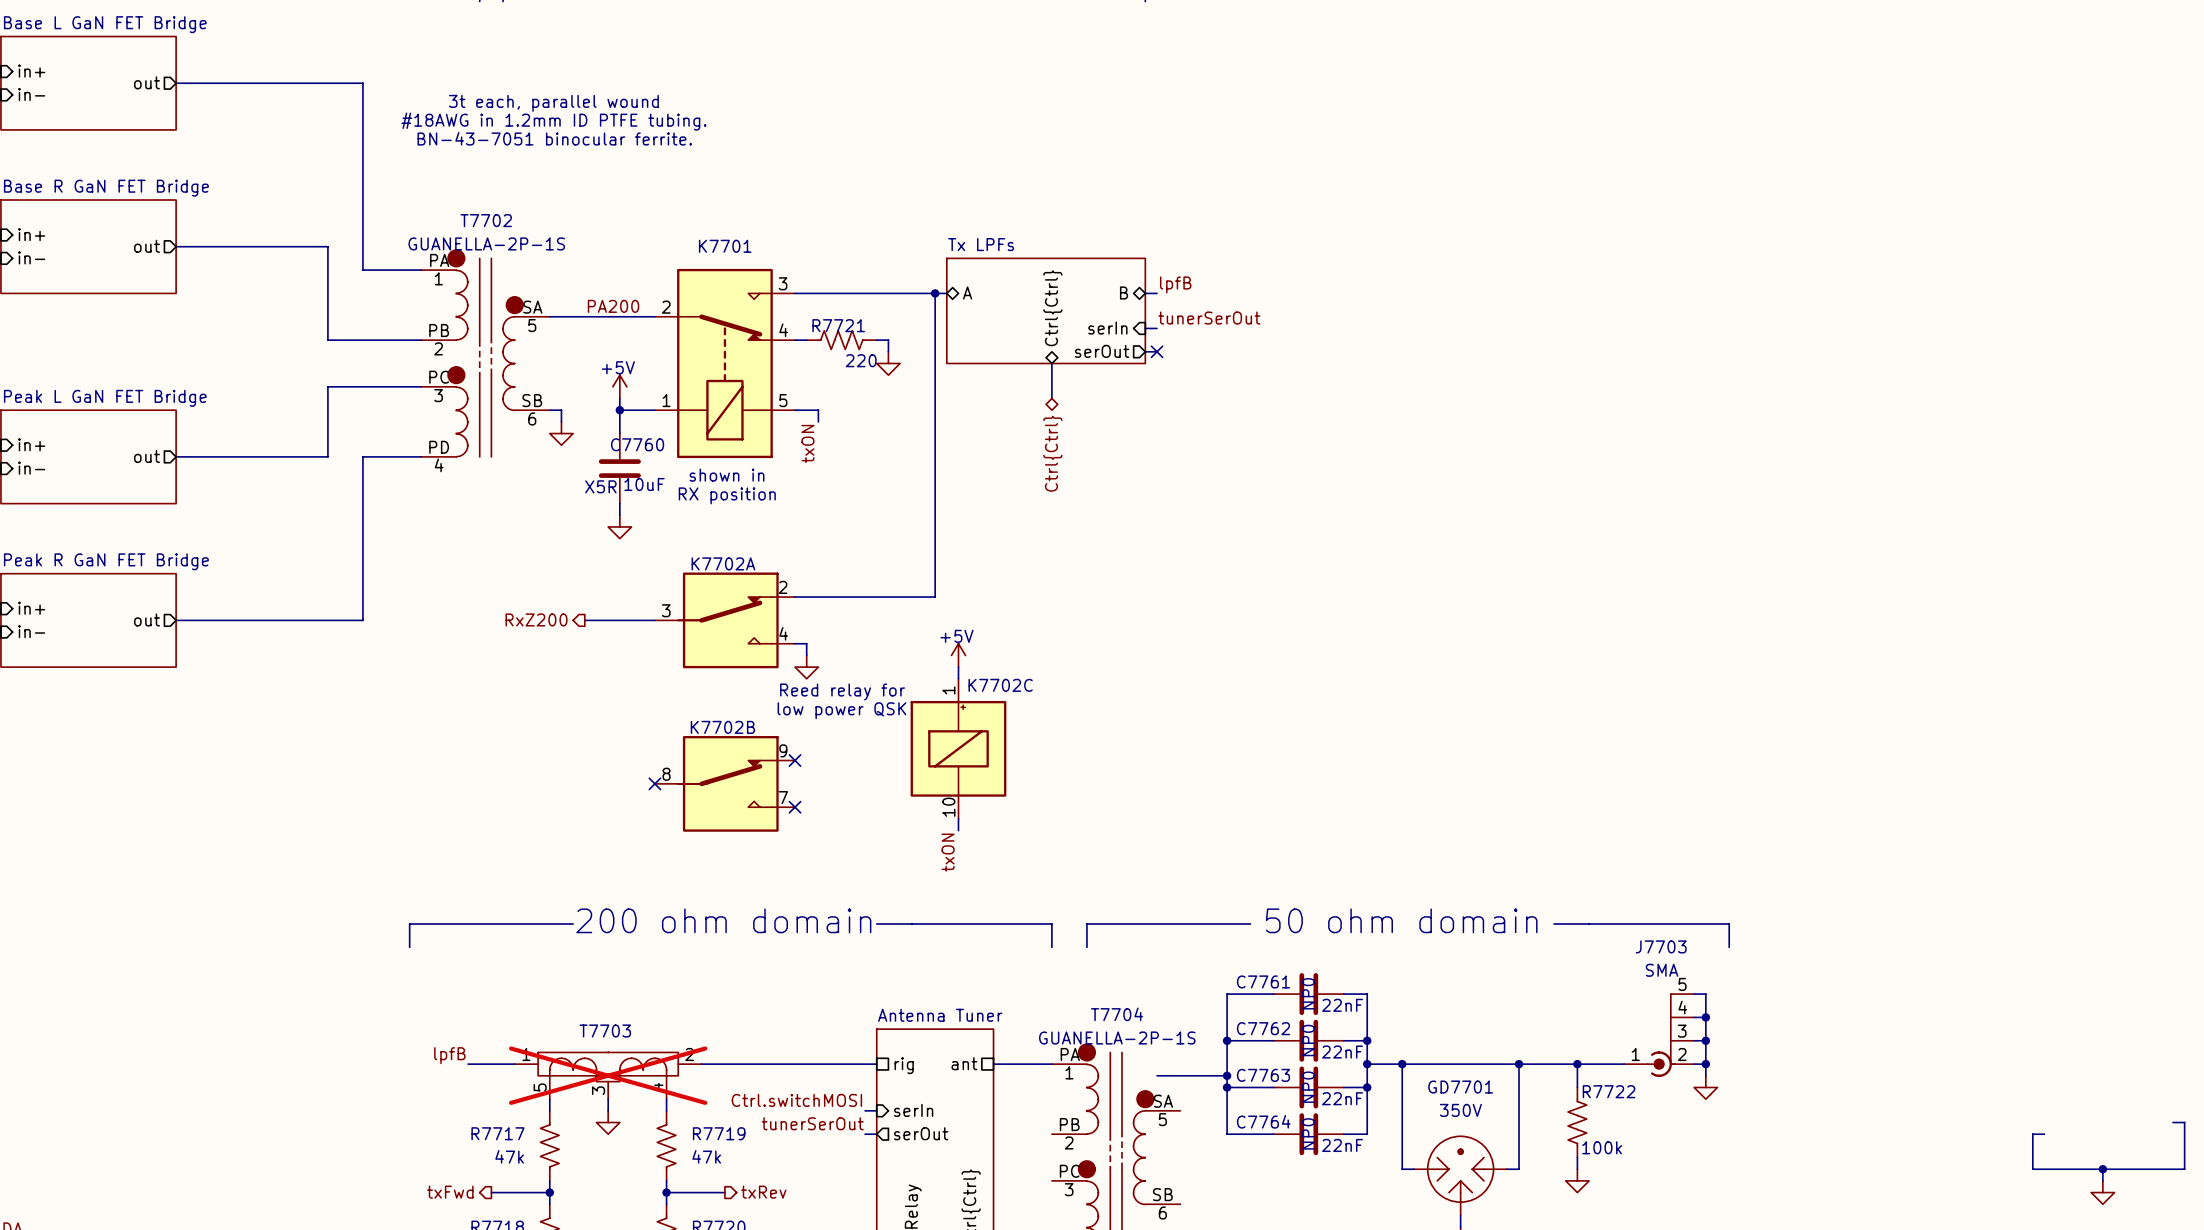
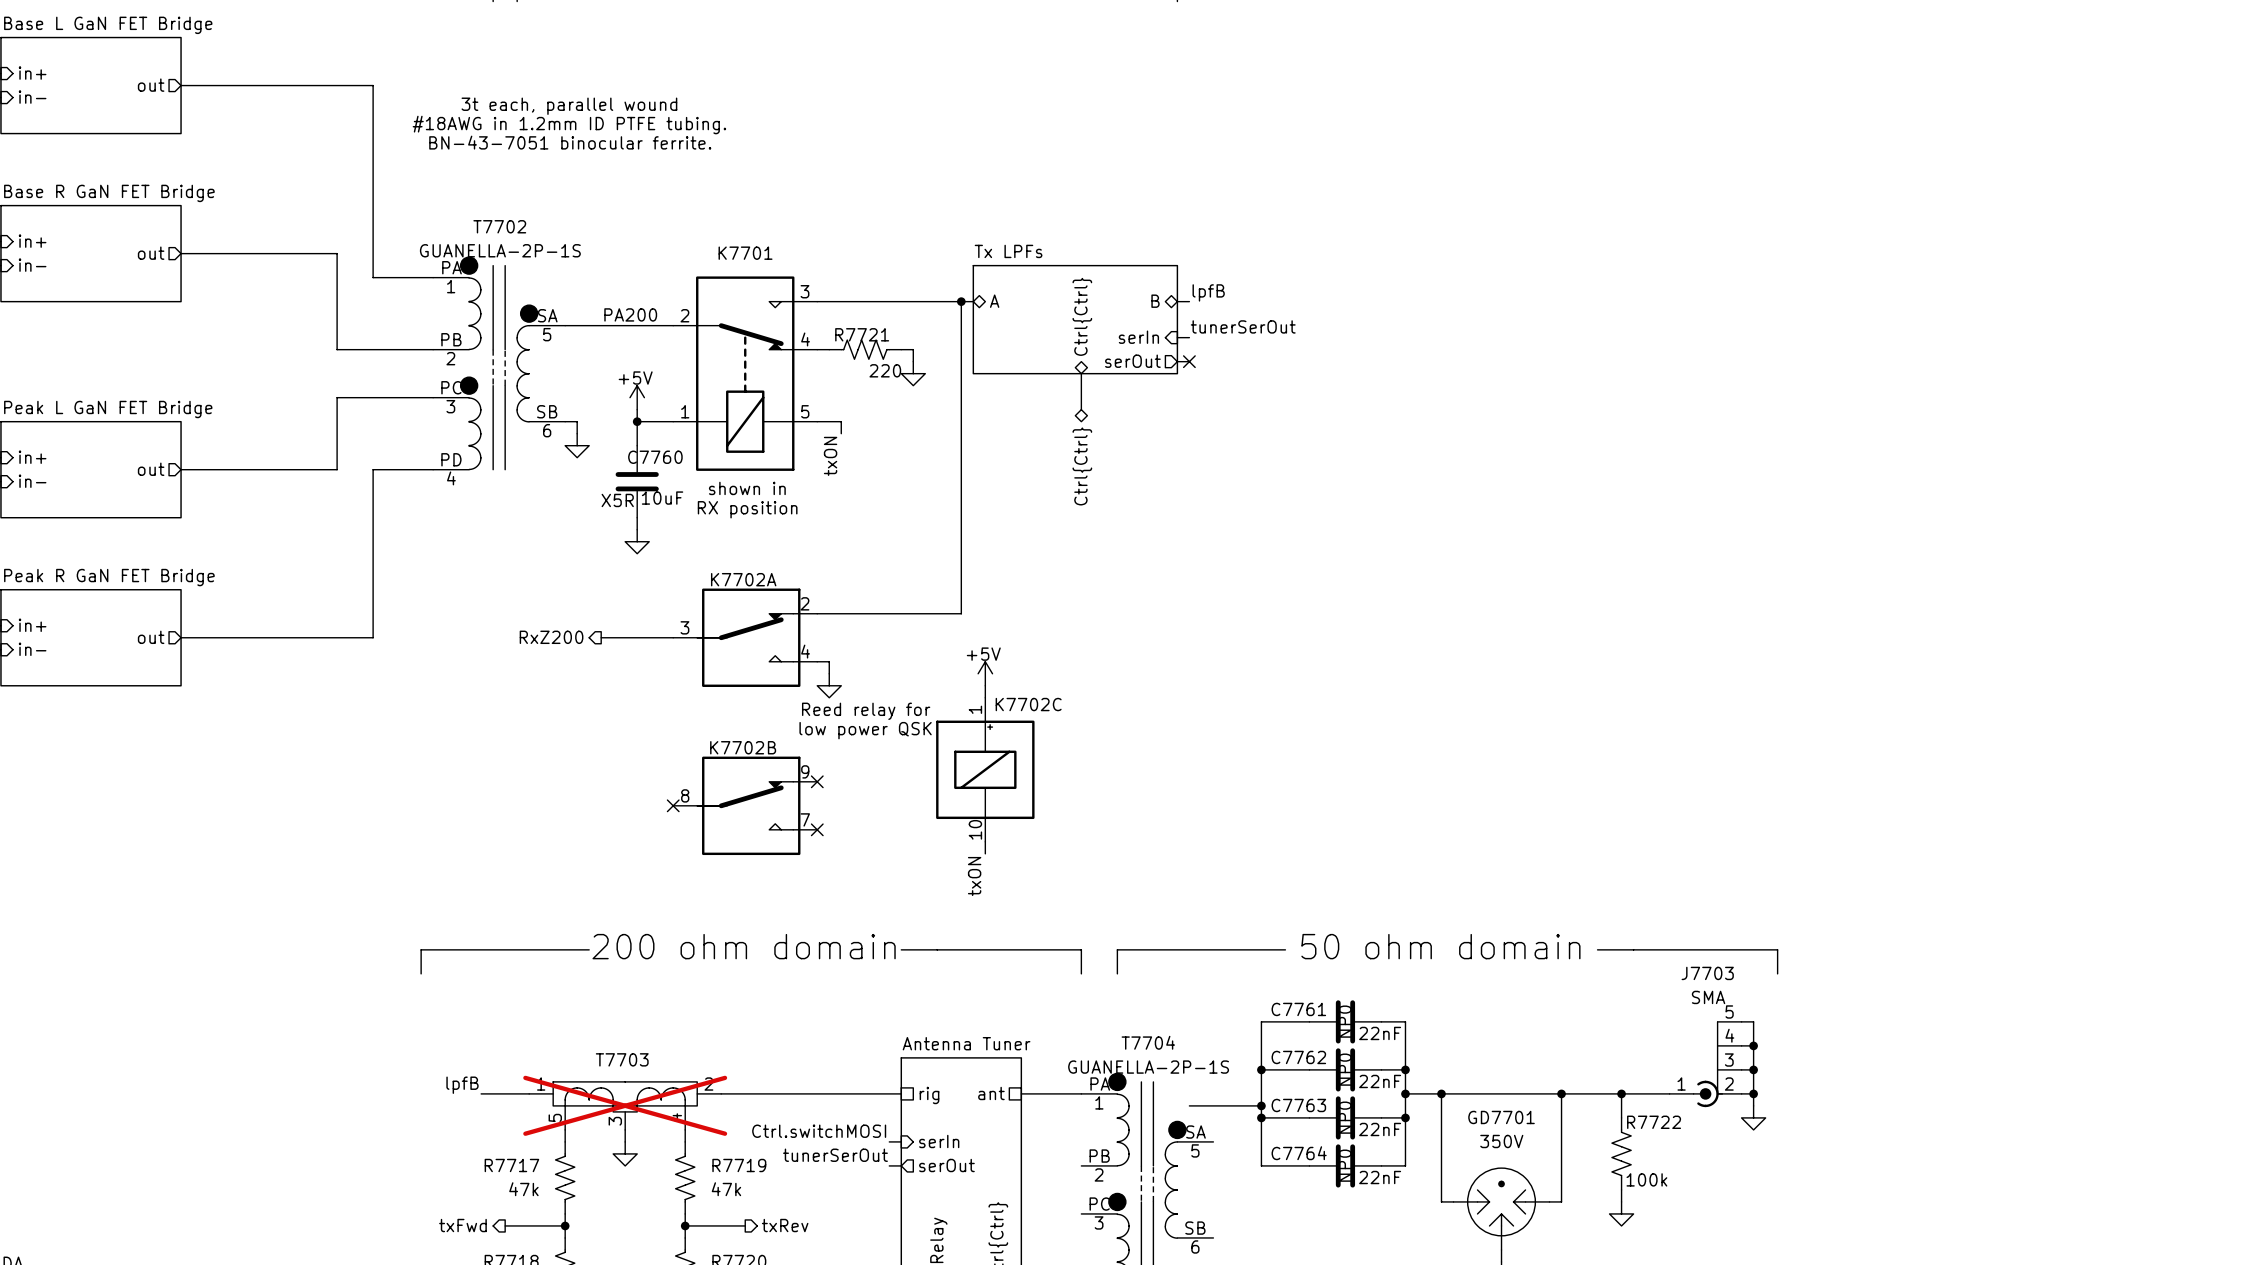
wire: (2172, 1122) (2184, 1122) (2184, 1169) (2032, 1169) (2032, 1134) (2044, 1134) -> none
wire: (2102, 1169) (2102, 1180) -> none
junction: (2102, 1169) -> none
power symbol: (2102, 1192) -> none

